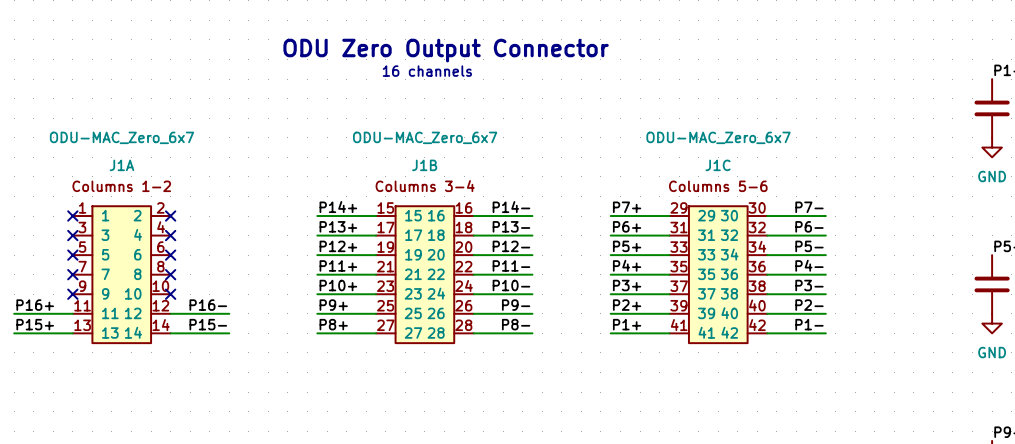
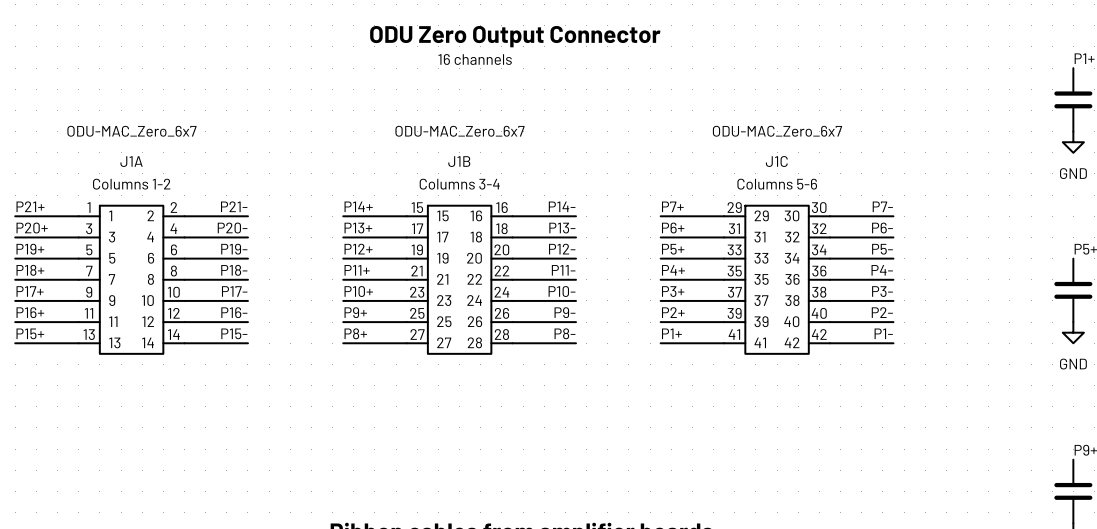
label: none -> P21+ (30, 206)
label: none -> P21- (234, 206)
wire: none -> (15, 216) (78, 216)
no-connect mark: (72, 216) -> none
wire: none -> (184, 216) (247, 216)
no-connect mark: (170, 216) -> none
label: none -> P20+ (32, 228)
label: none -> P20- (232, 228)
wire: none -> (15, 237) (78, 237)
no-connect mark: (72, 235) -> none
wire: none -> (184, 237) (247, 237)
no-connect mark: (170, 235) -> none
label: none -> P19+ (30, 249)
label: none -> P19- (234, 249)
wire: none -> (15, 258) (78, 258)
no-connect mark: (72, 255) -> none
wire: none -> (184, 258) (247, 258)
no-connect mark: (170, 255) -> none
label: none -> P18+ (30, 270)
label: none -> P18- (234, 270)
wire: none -> (15, 279) (78, 279)
no-connect mark: (72, 274) -> none
wire: none -> (184, 279) (247, 279)
no-connect mark: (170, 274) -> none
label: none -> P17+ (30, 291)
label: none -> P17- (234, 291)
wire: none -> (15, 300) (78, 300)
no-connect mark: (72, 294) -> none
wire: none -> (184, 300) (247, 300)
no-connect mark: (170, 294) -> none

